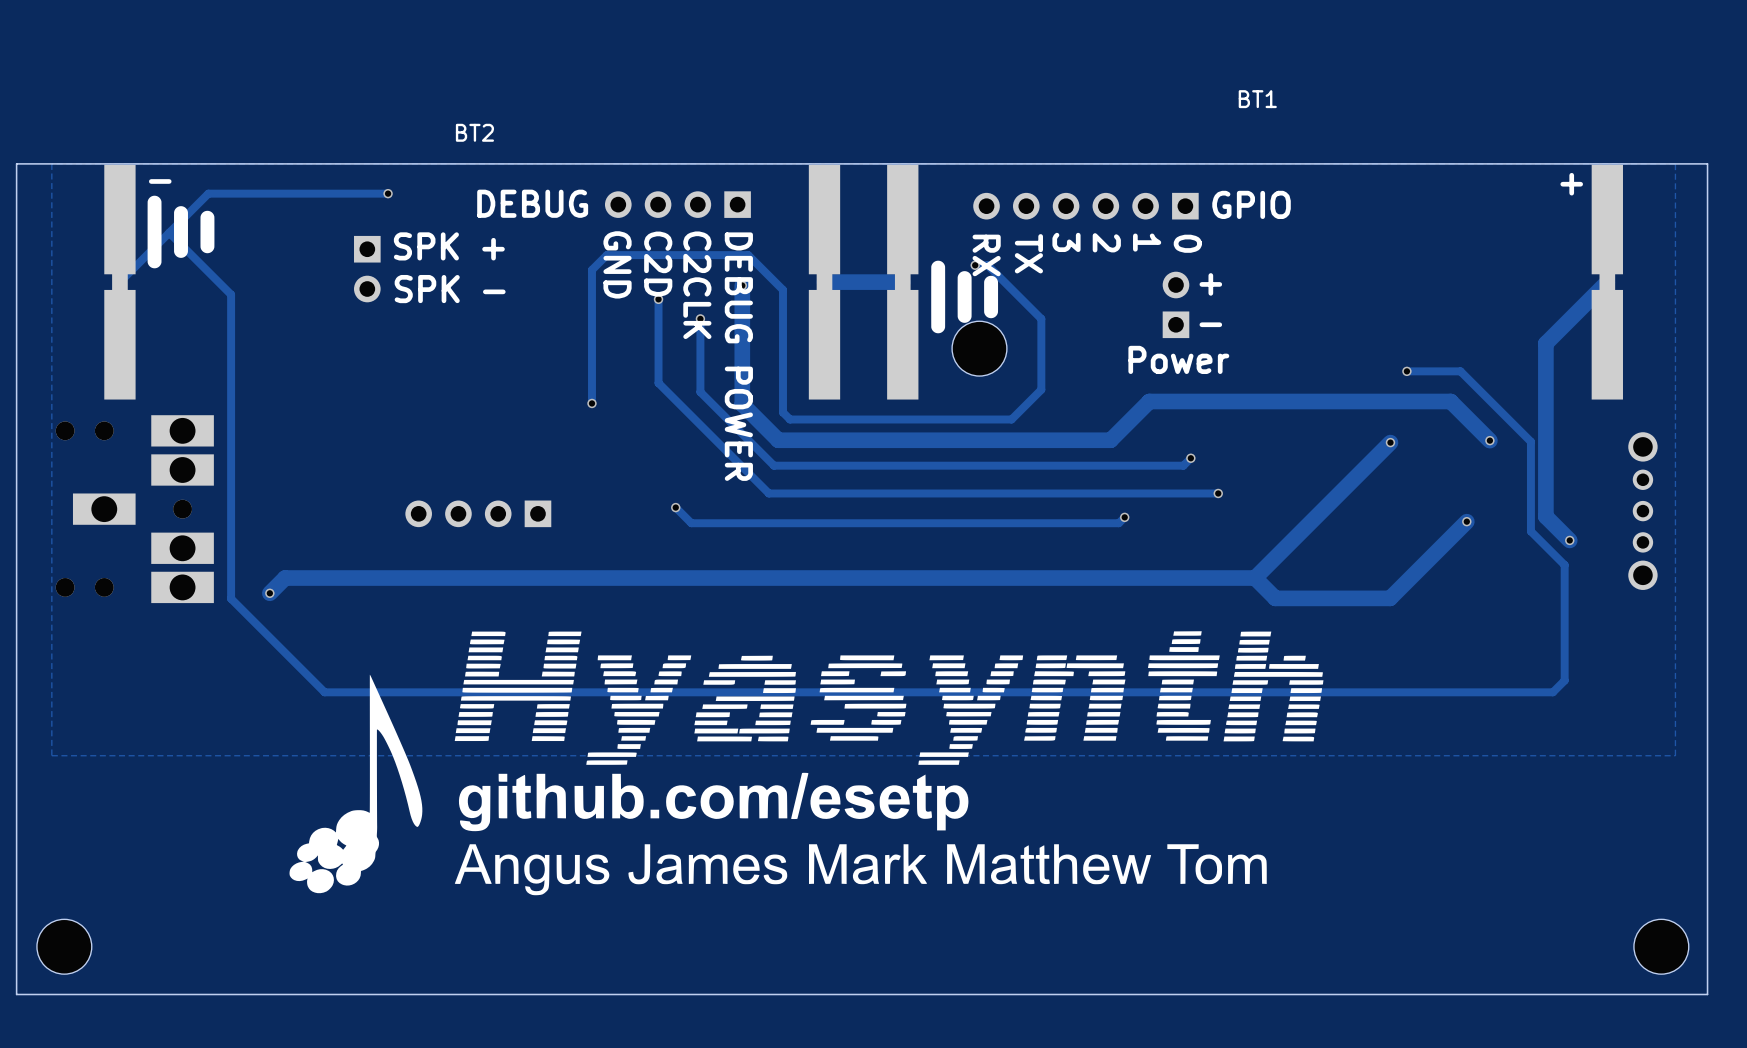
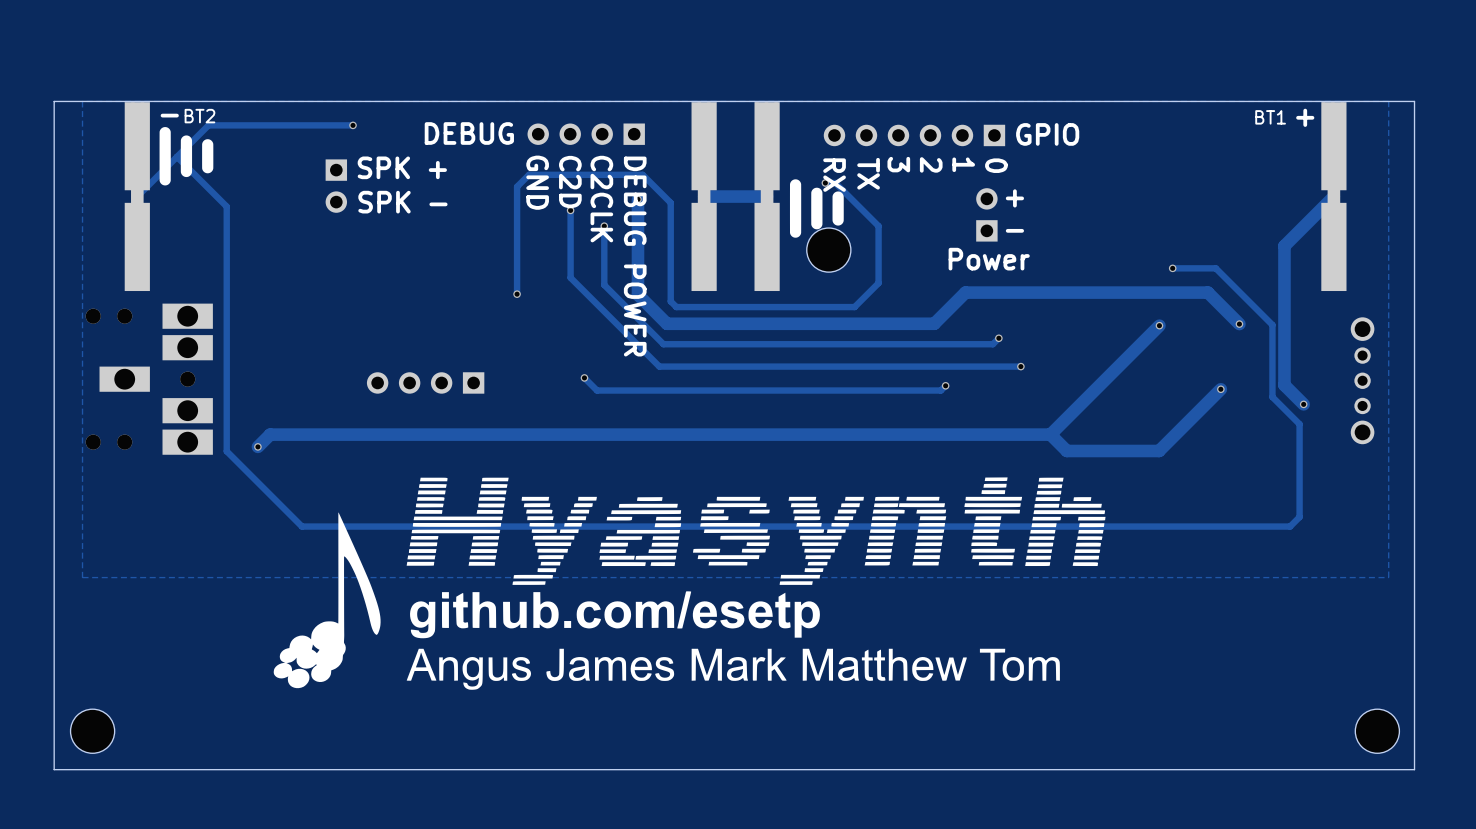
BT1 name position: BT1 (1257, 99) -> BT1 (1270, 117)
BT2 name position: BT2 (474, 132) -> BT2 (199, 116)

